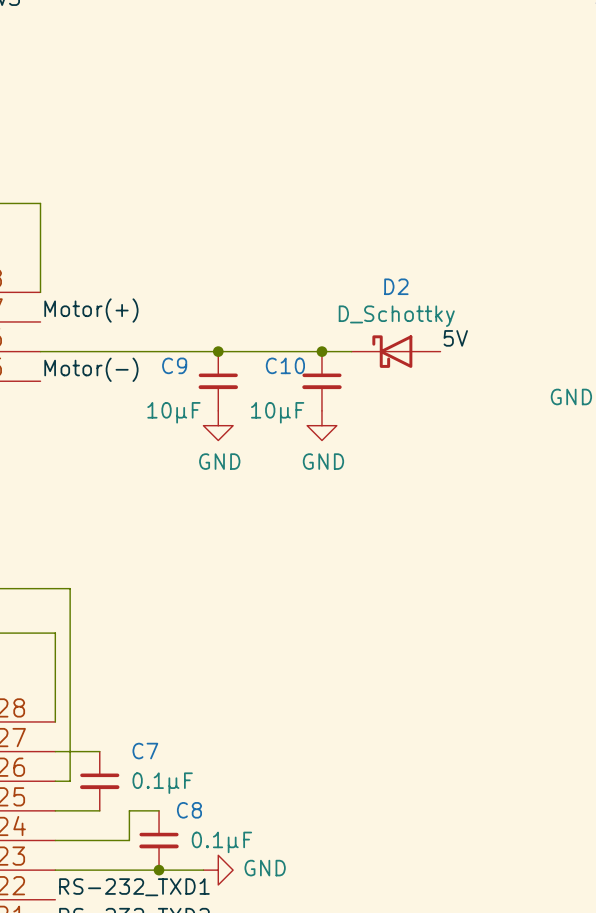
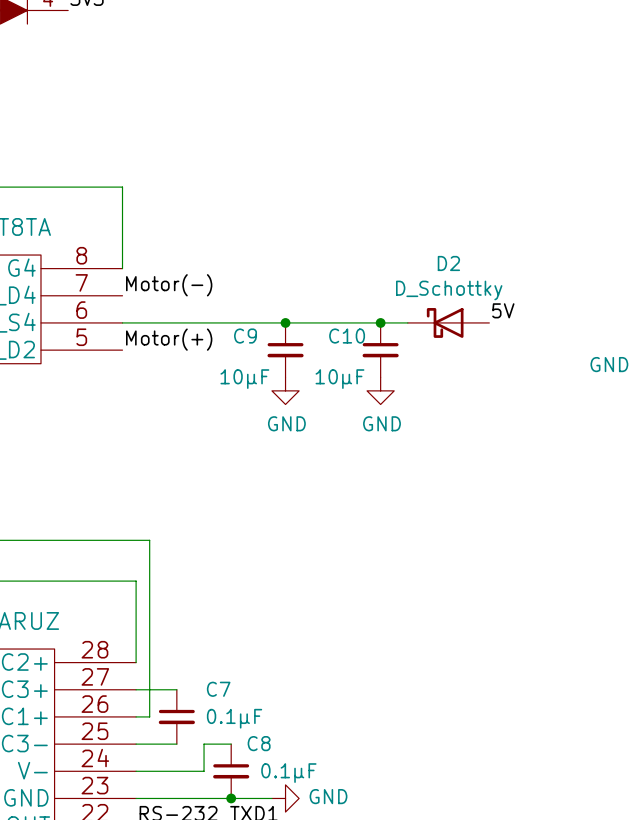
label: Motor(+) (91, 310) -> Motor(-) (169, 285)
label: Motor(-) (91, 369) -> Motor(+) (169, 339)

